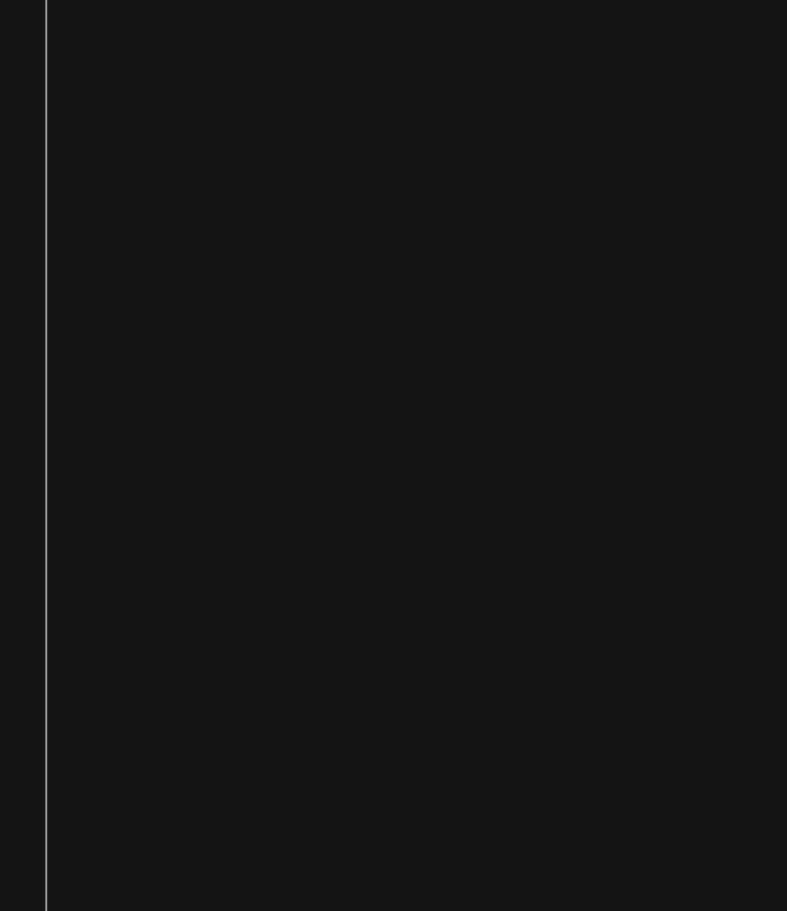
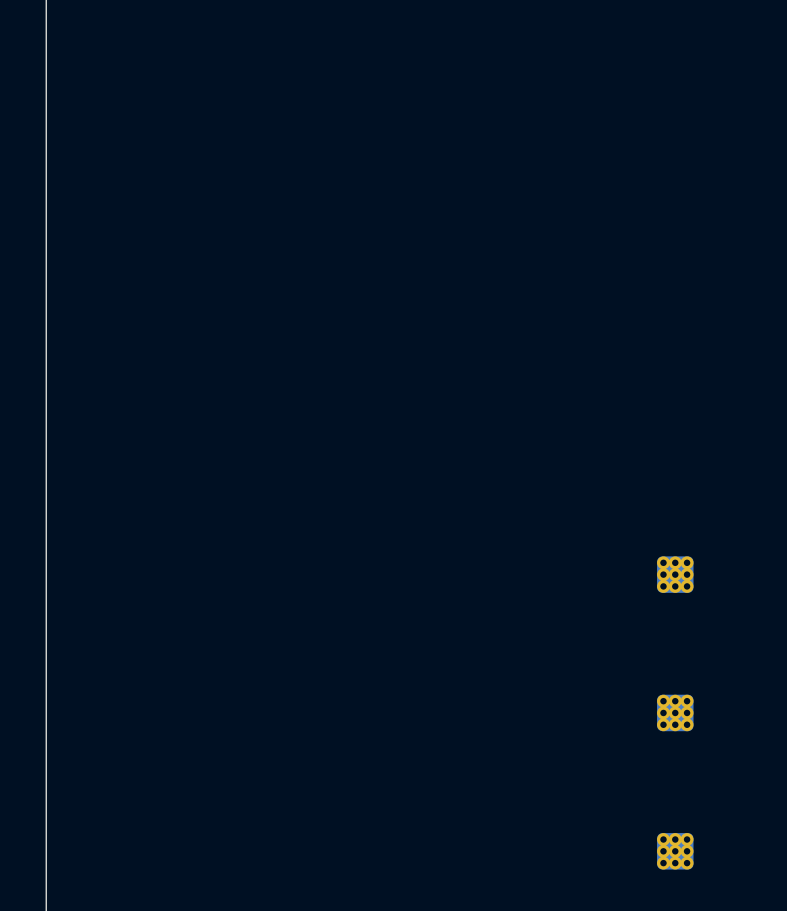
part: none -> (675, 574)
part: none -> (675, 712)
part: none -> (675, 851)

